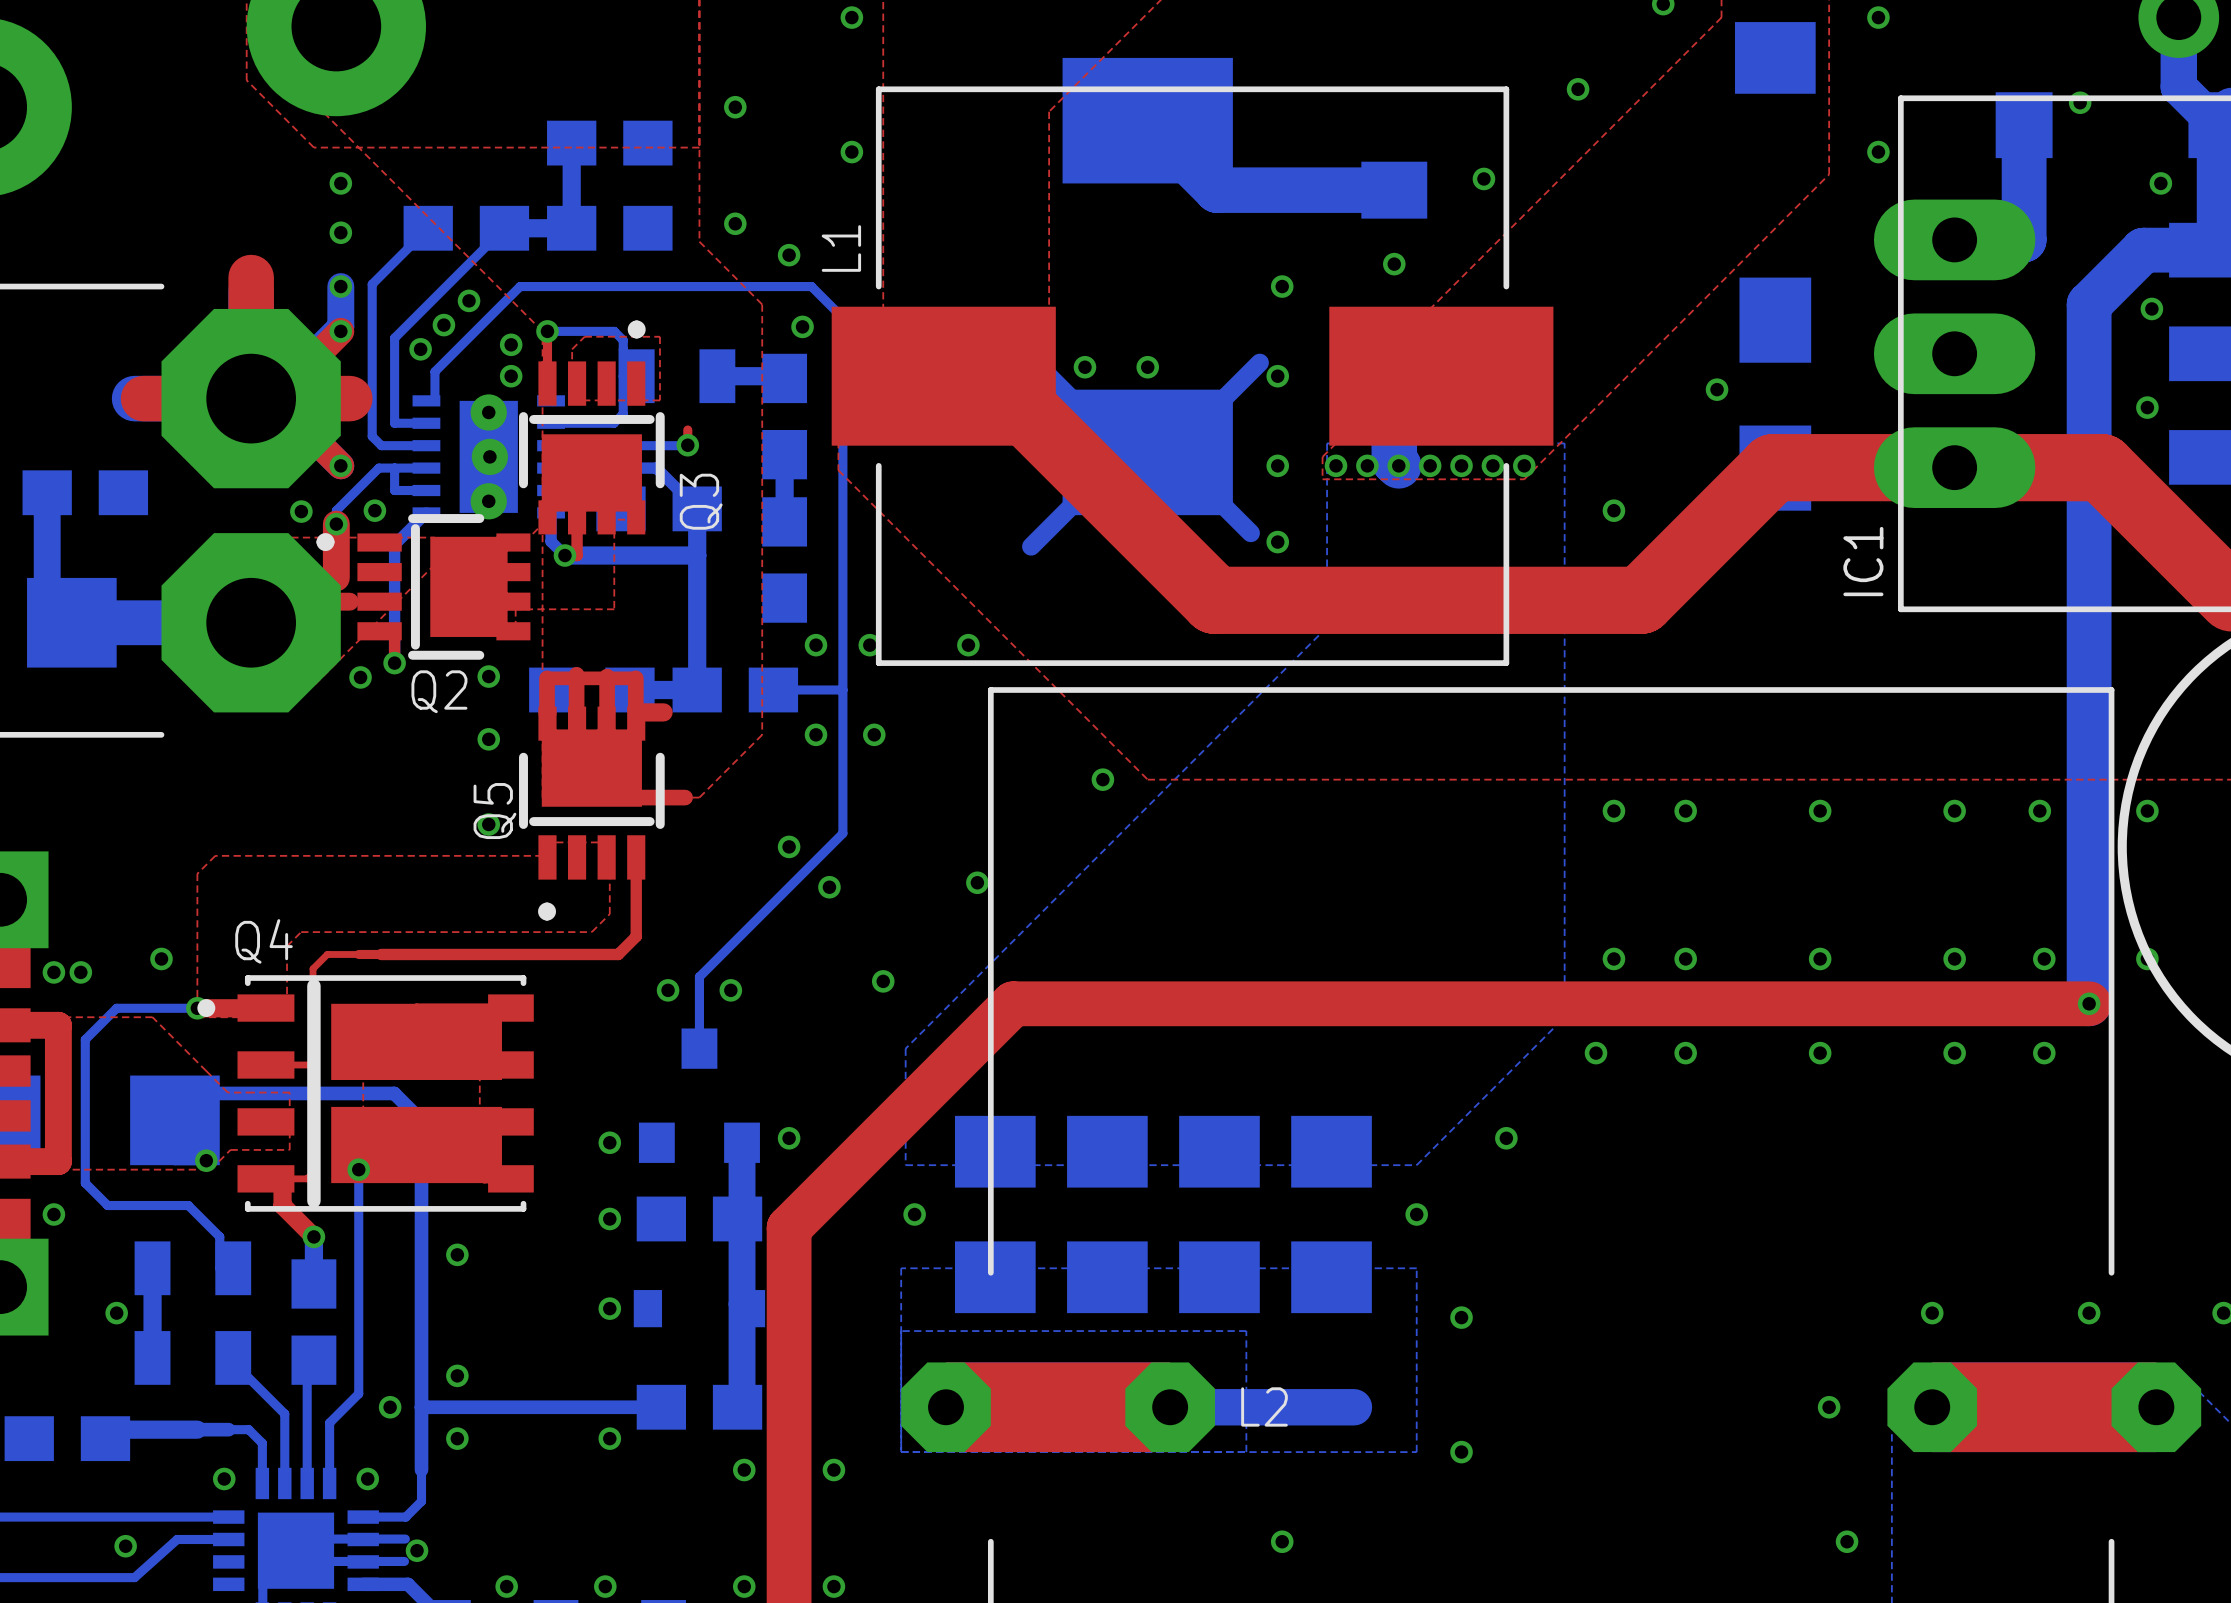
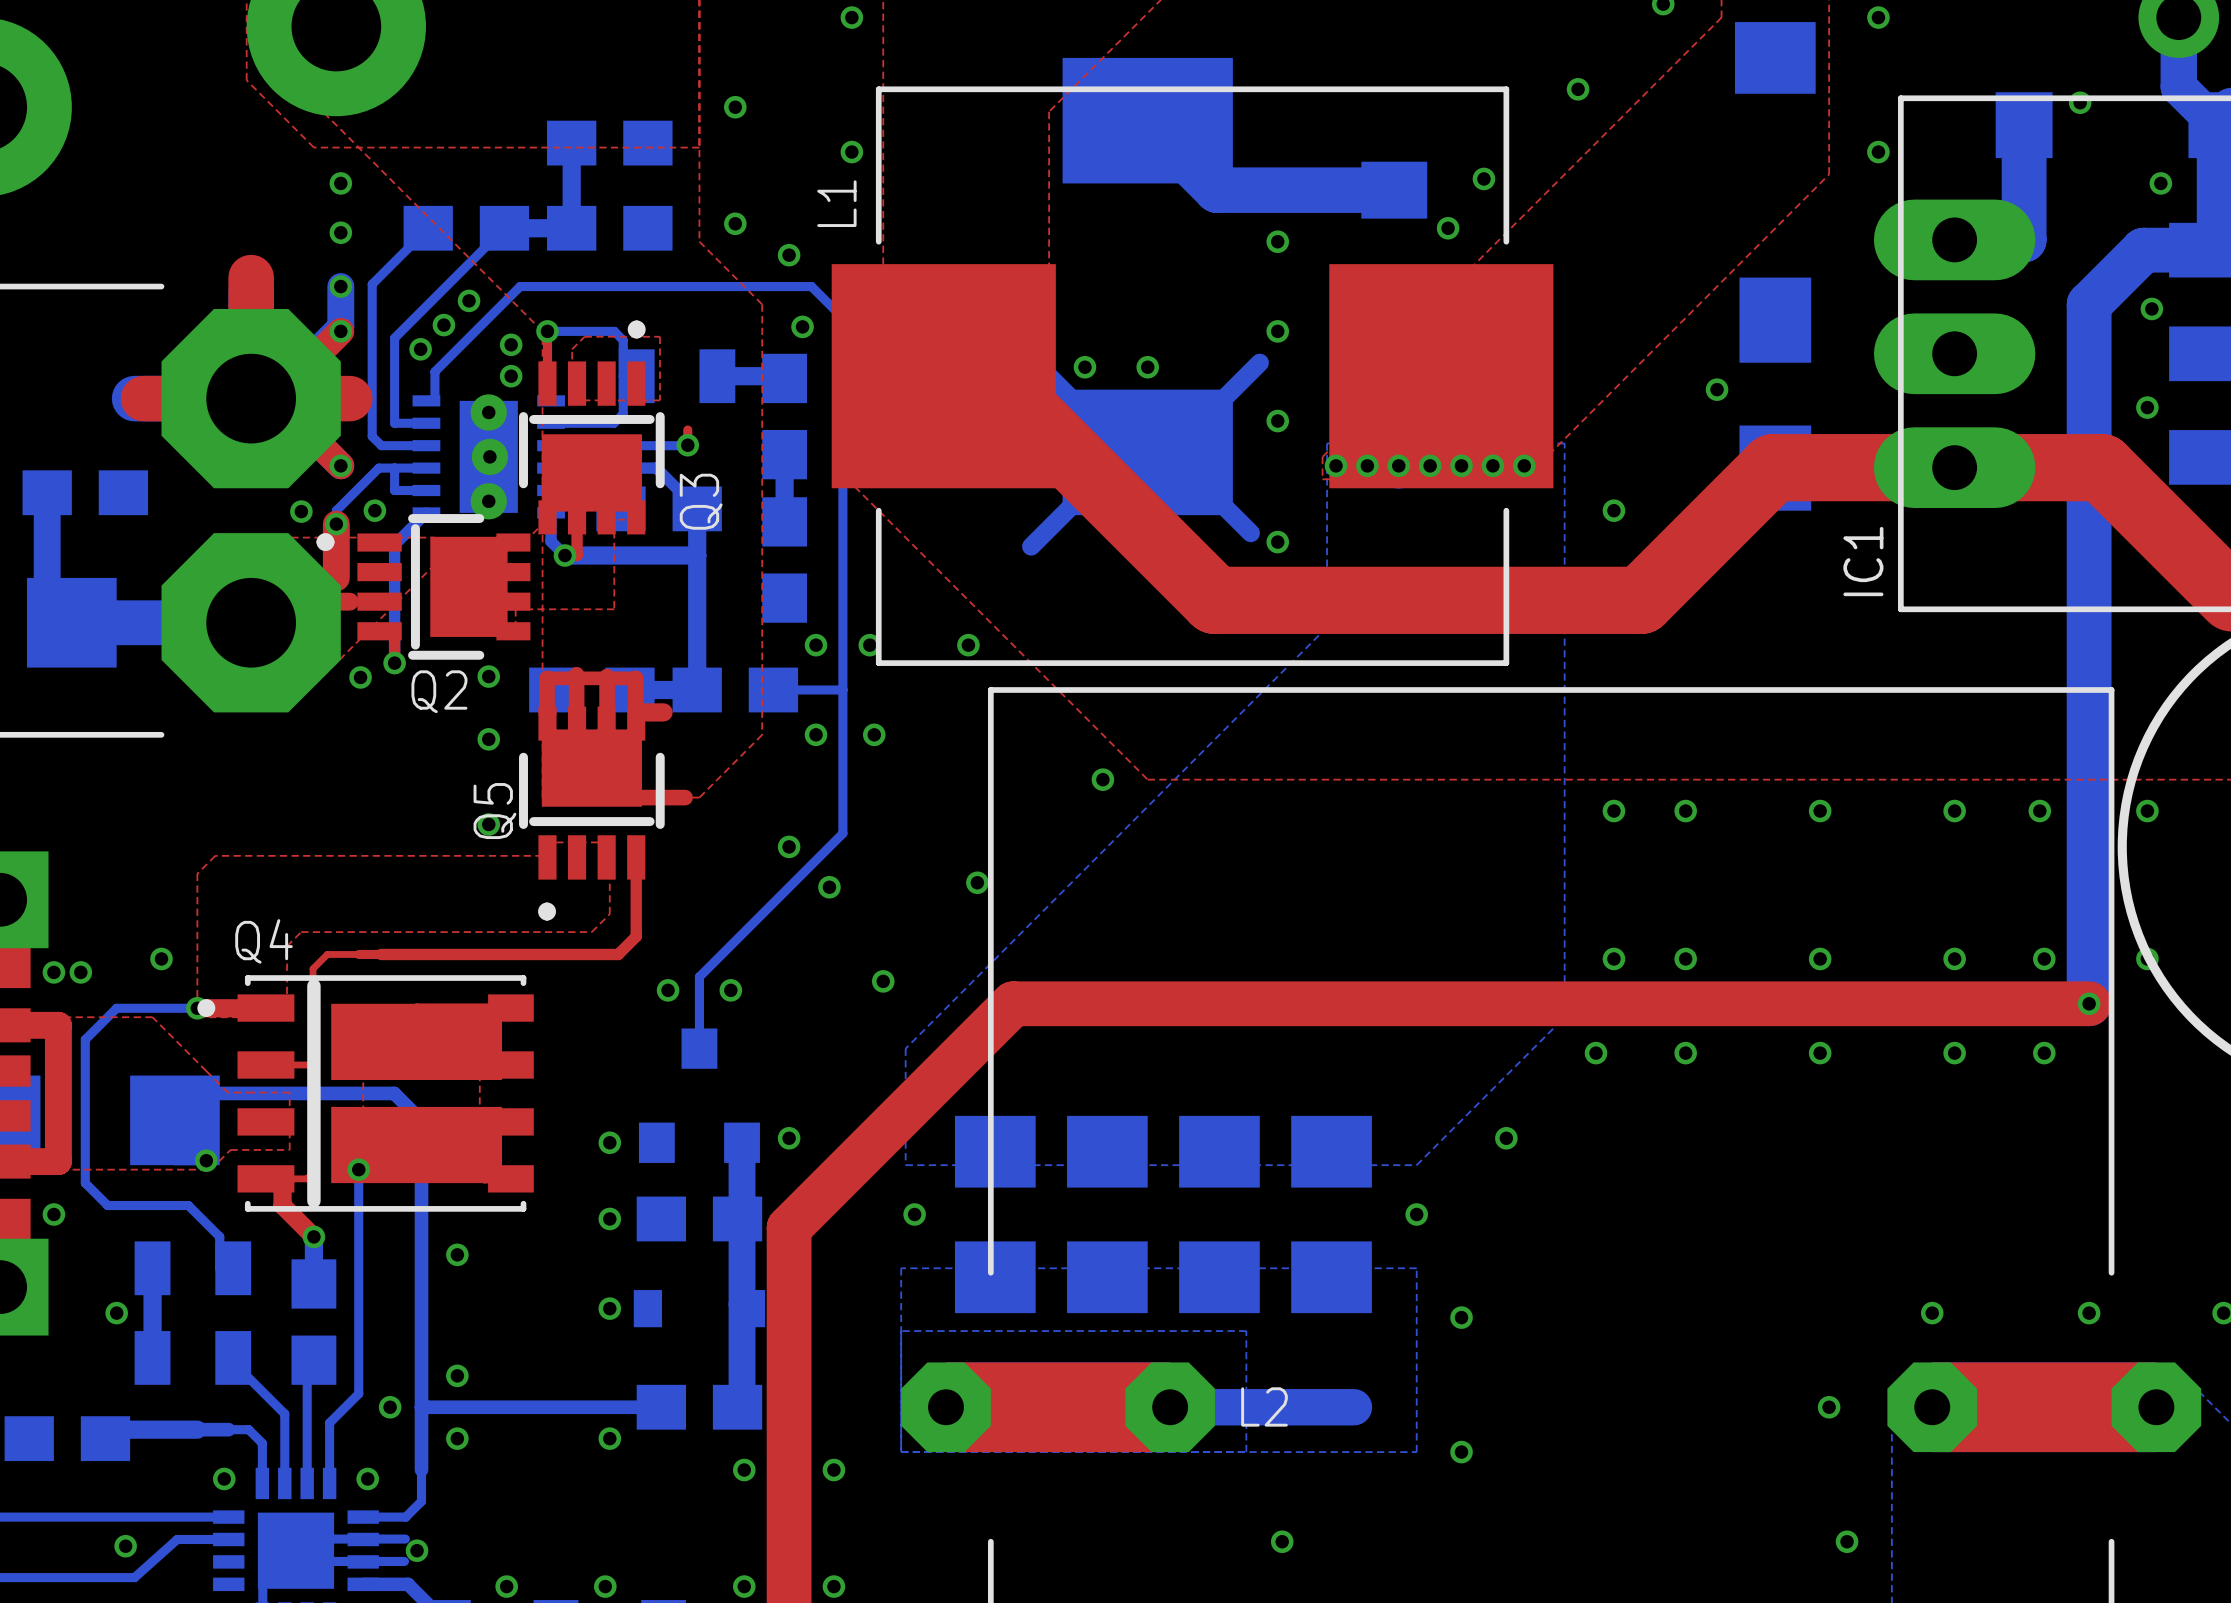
L1 footprint: [831, 86, 1554, 666] -> [831, 86, 1554, 666]
via: none -> (1448, 228)
via: none -> (1277, 241)
L1 name position: L1 (841, 248) -> L1 (836, 203)
via: (1394, 264) -> none
via: (1282, 286) -> none
via: none -> (1277, 331)
via: (1277, 376) -> none
via: none -> (1277, 421)
via: (1277, 465) -> none

